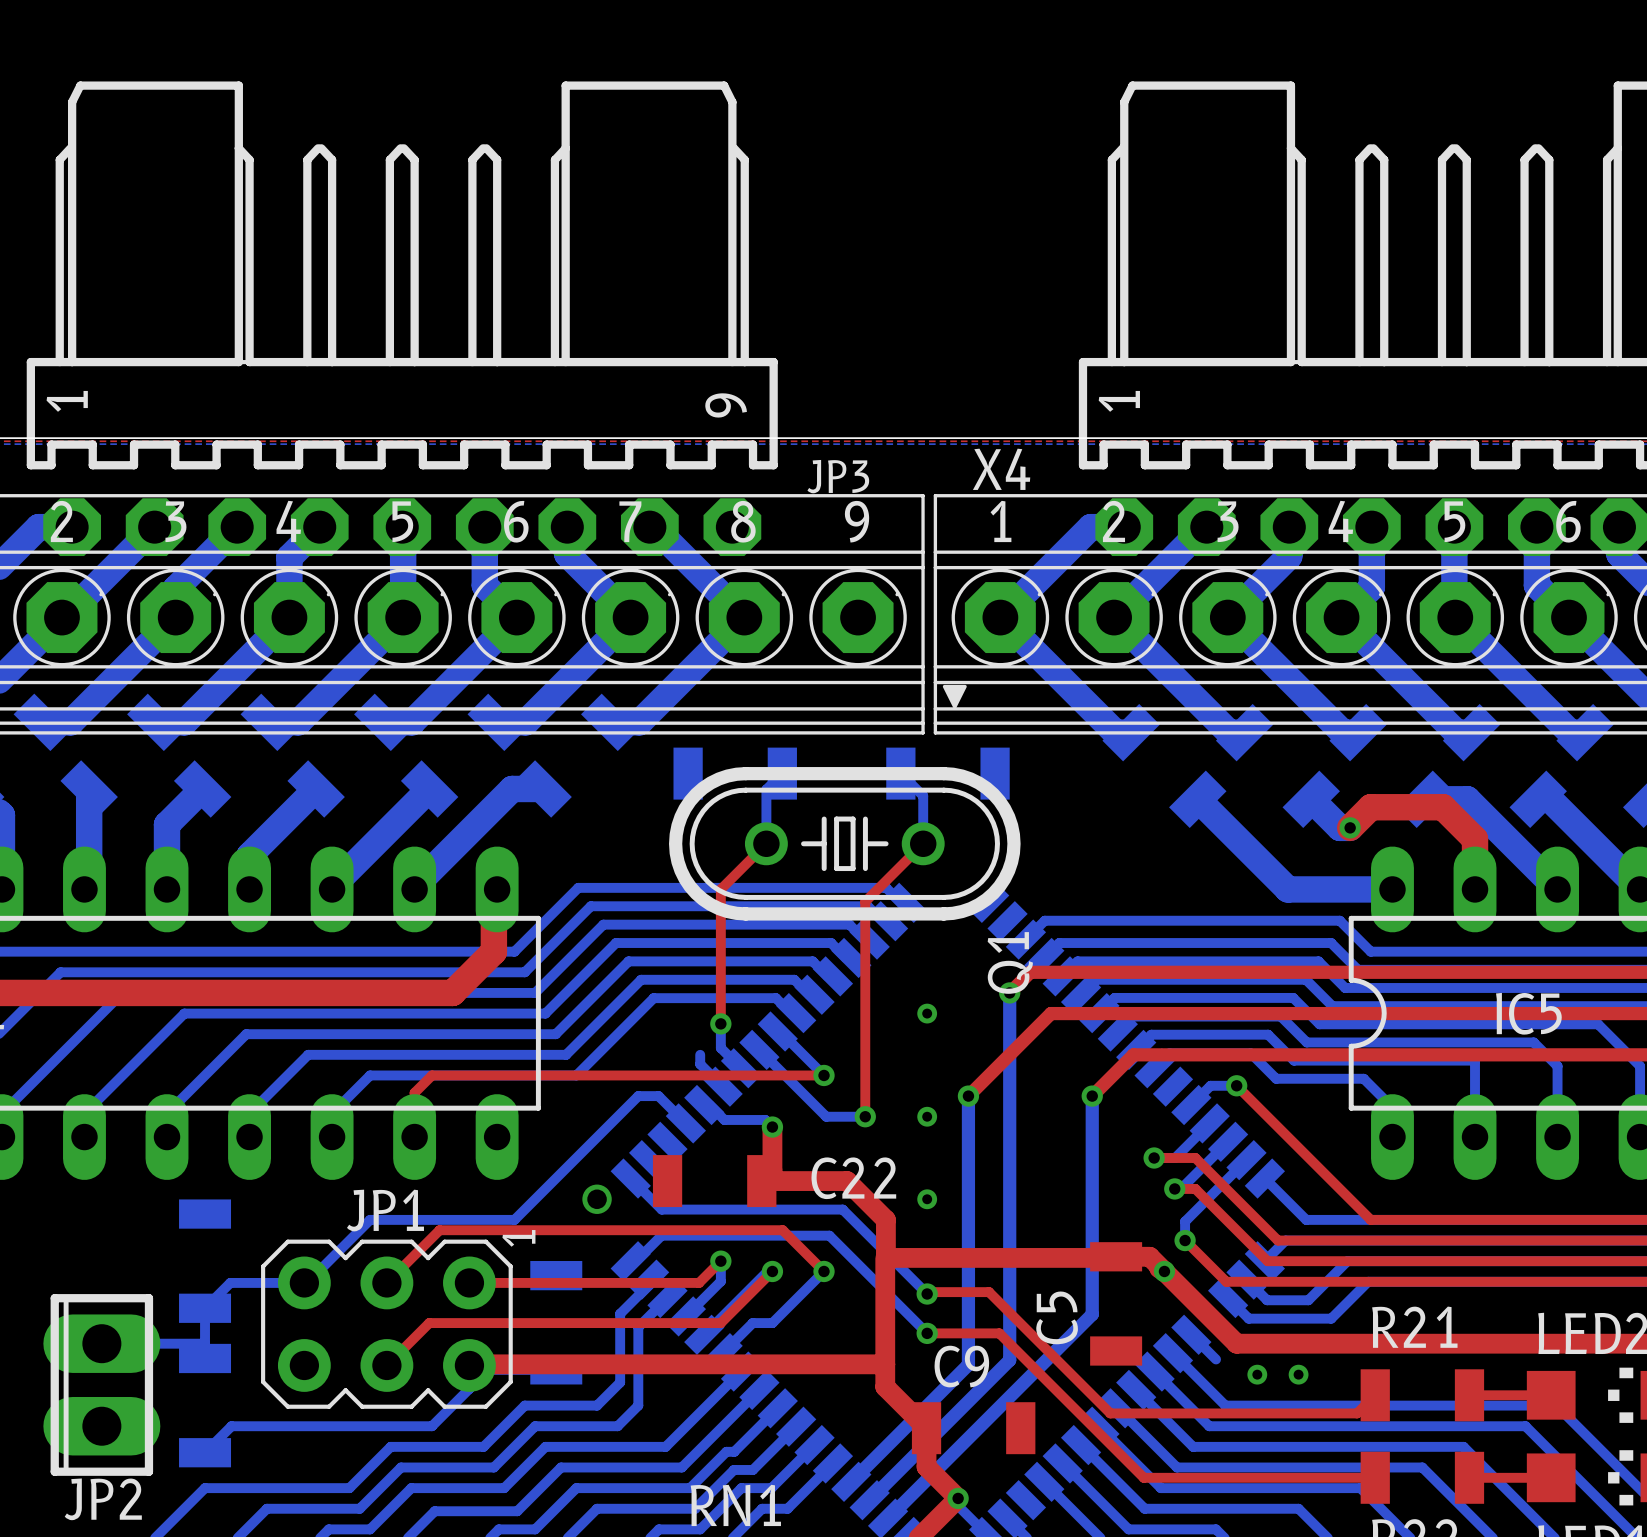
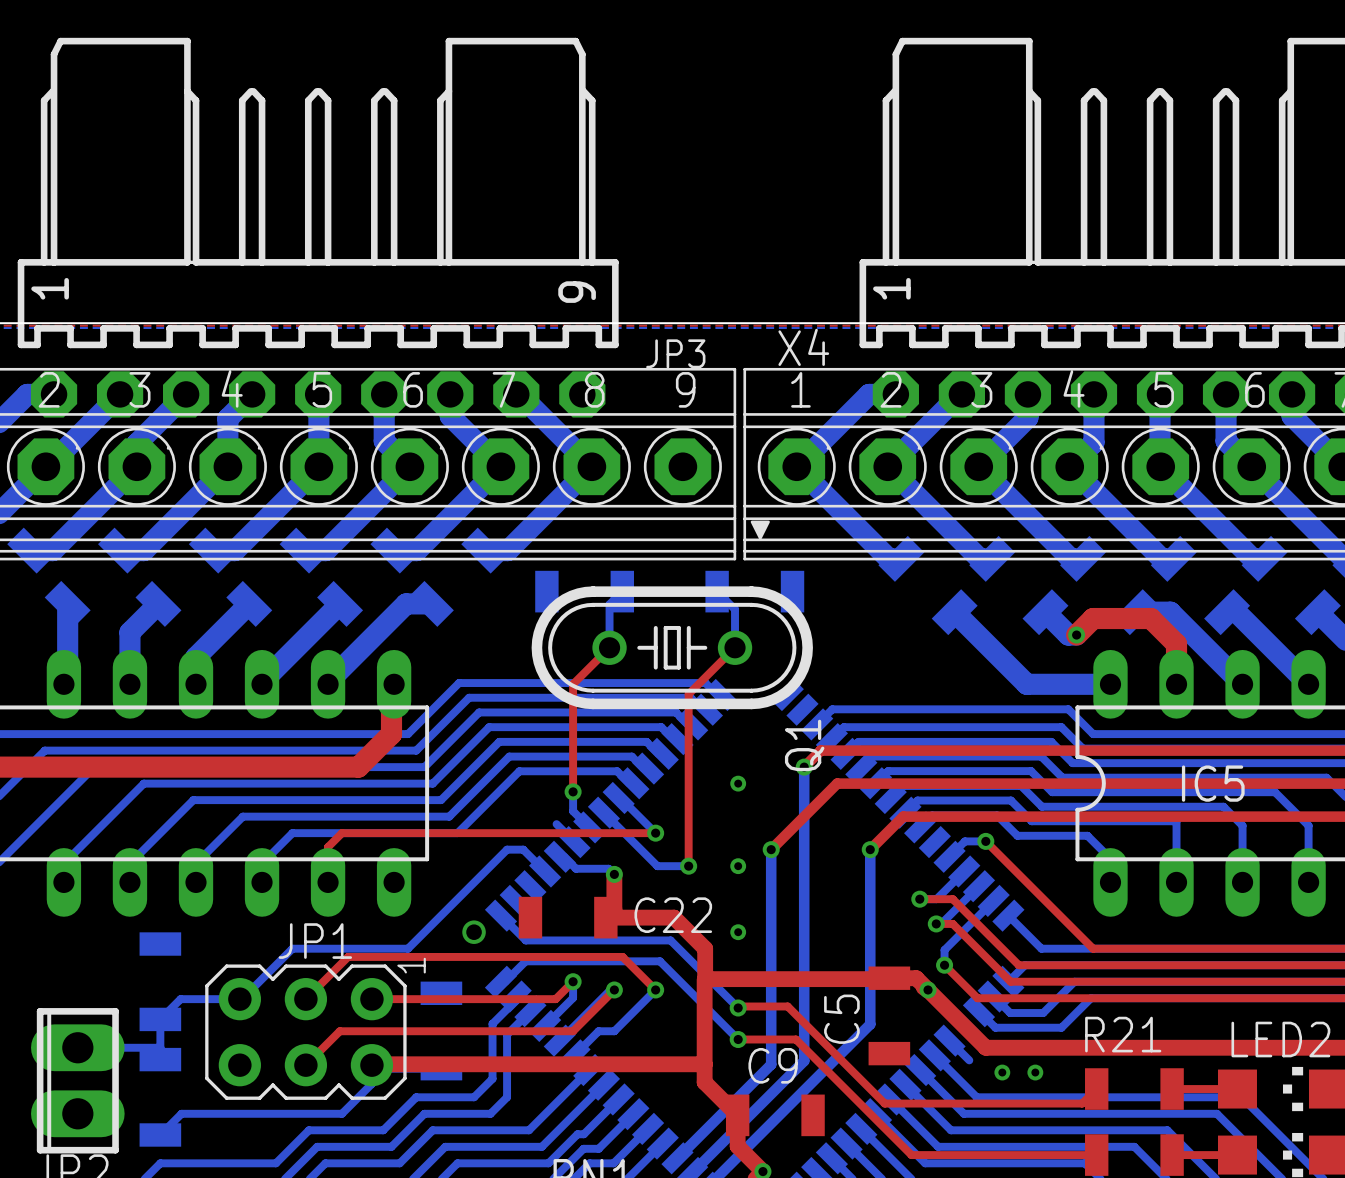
bottom track: (700, 1054) (700, 1064) -> none

